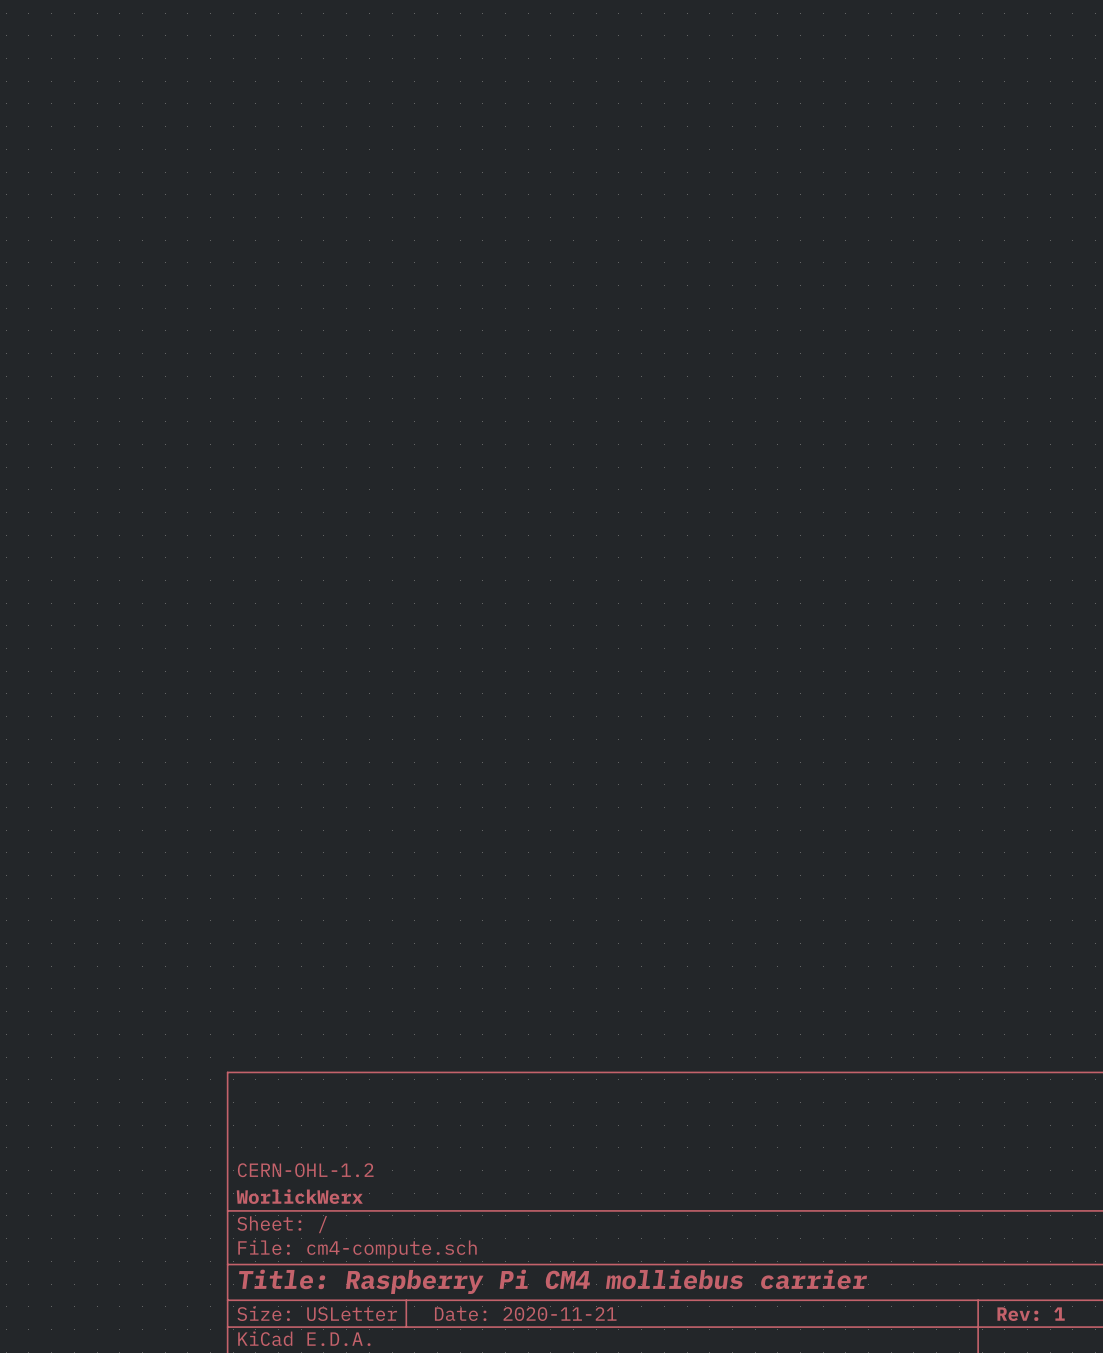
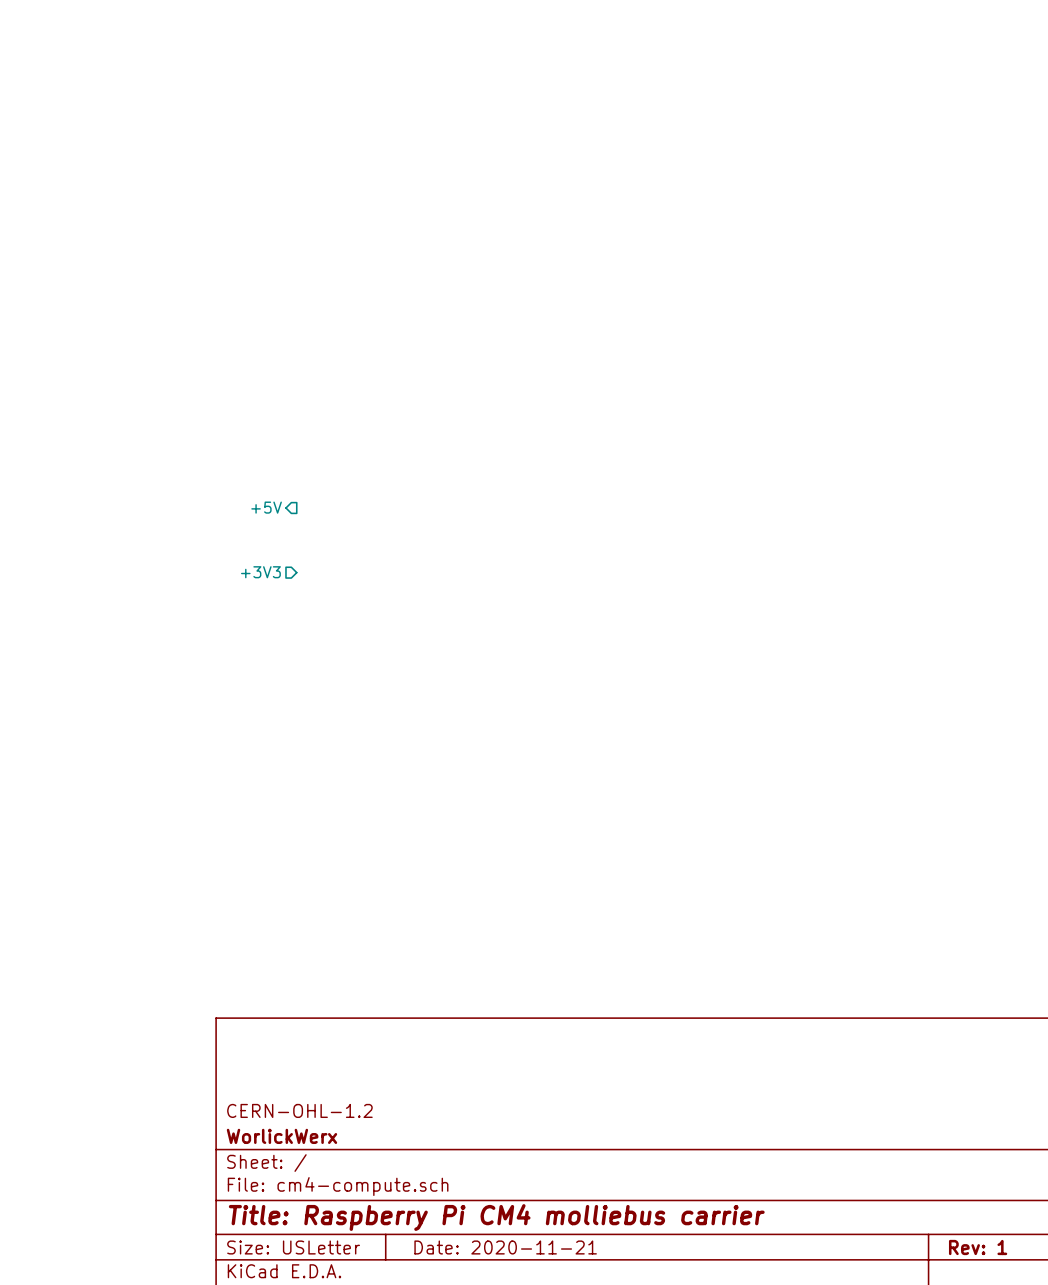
sheet pin: none -> +5V (266, 507)
sheet pin: none -> +3V3 (260, 572)

